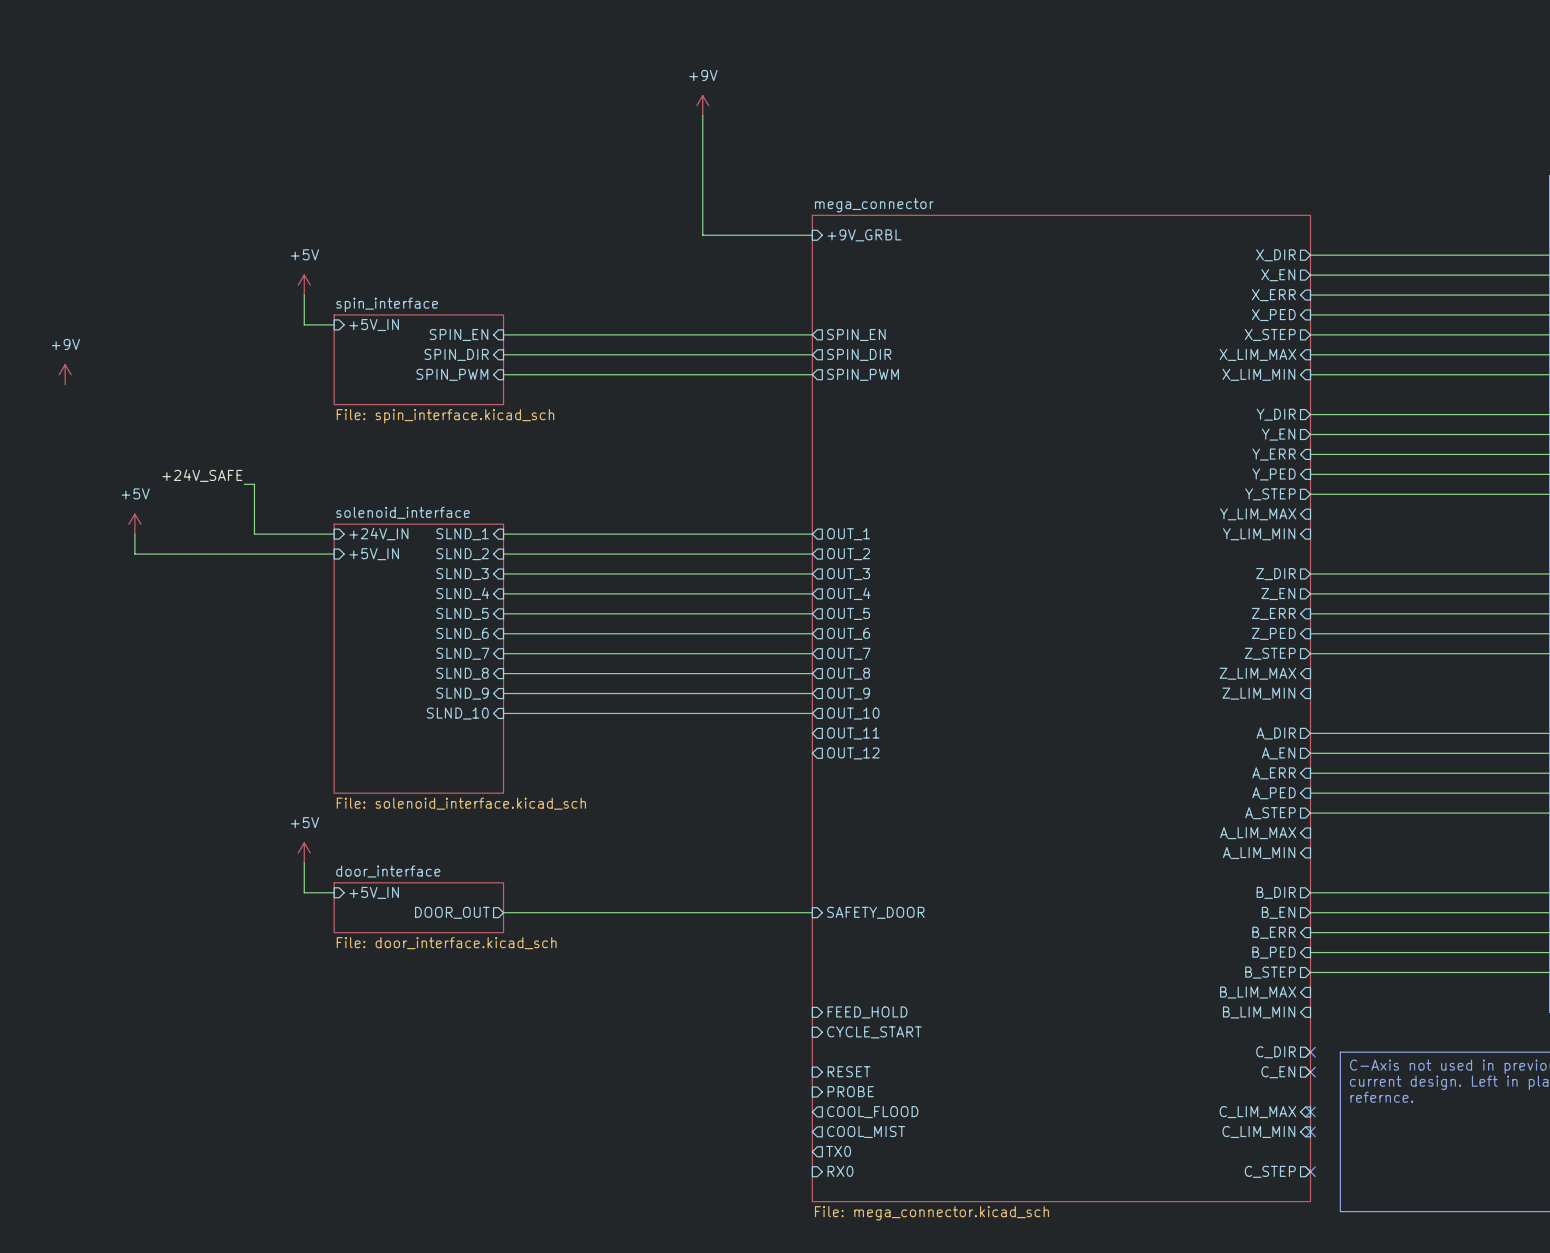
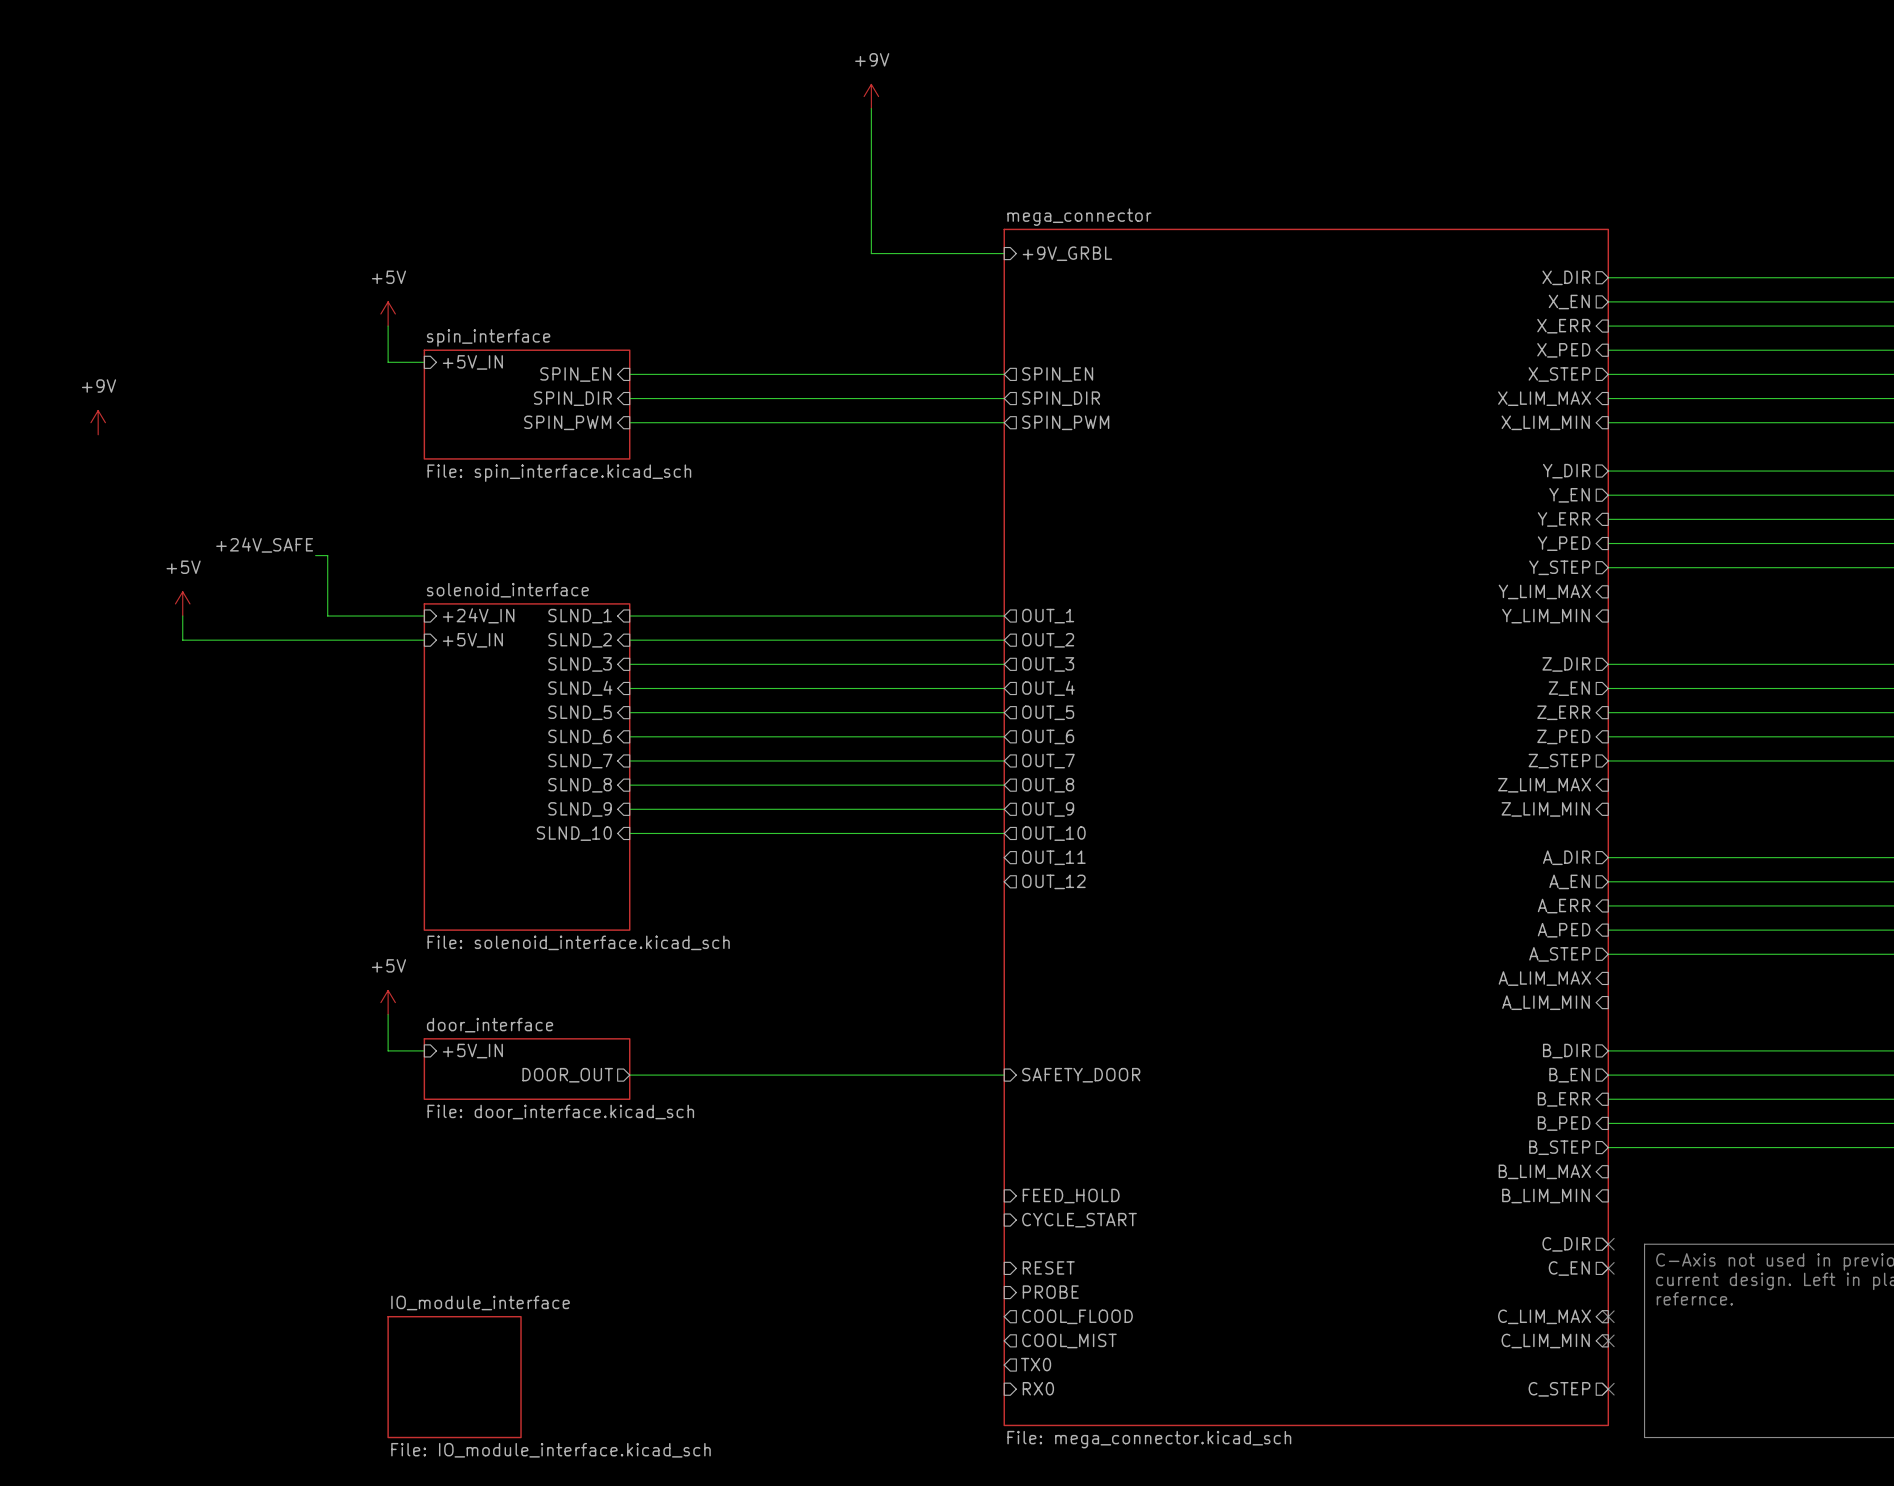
sheet IO_module_interface: none -> File: IO_module_interface.kicad_sch (454, 1377)

